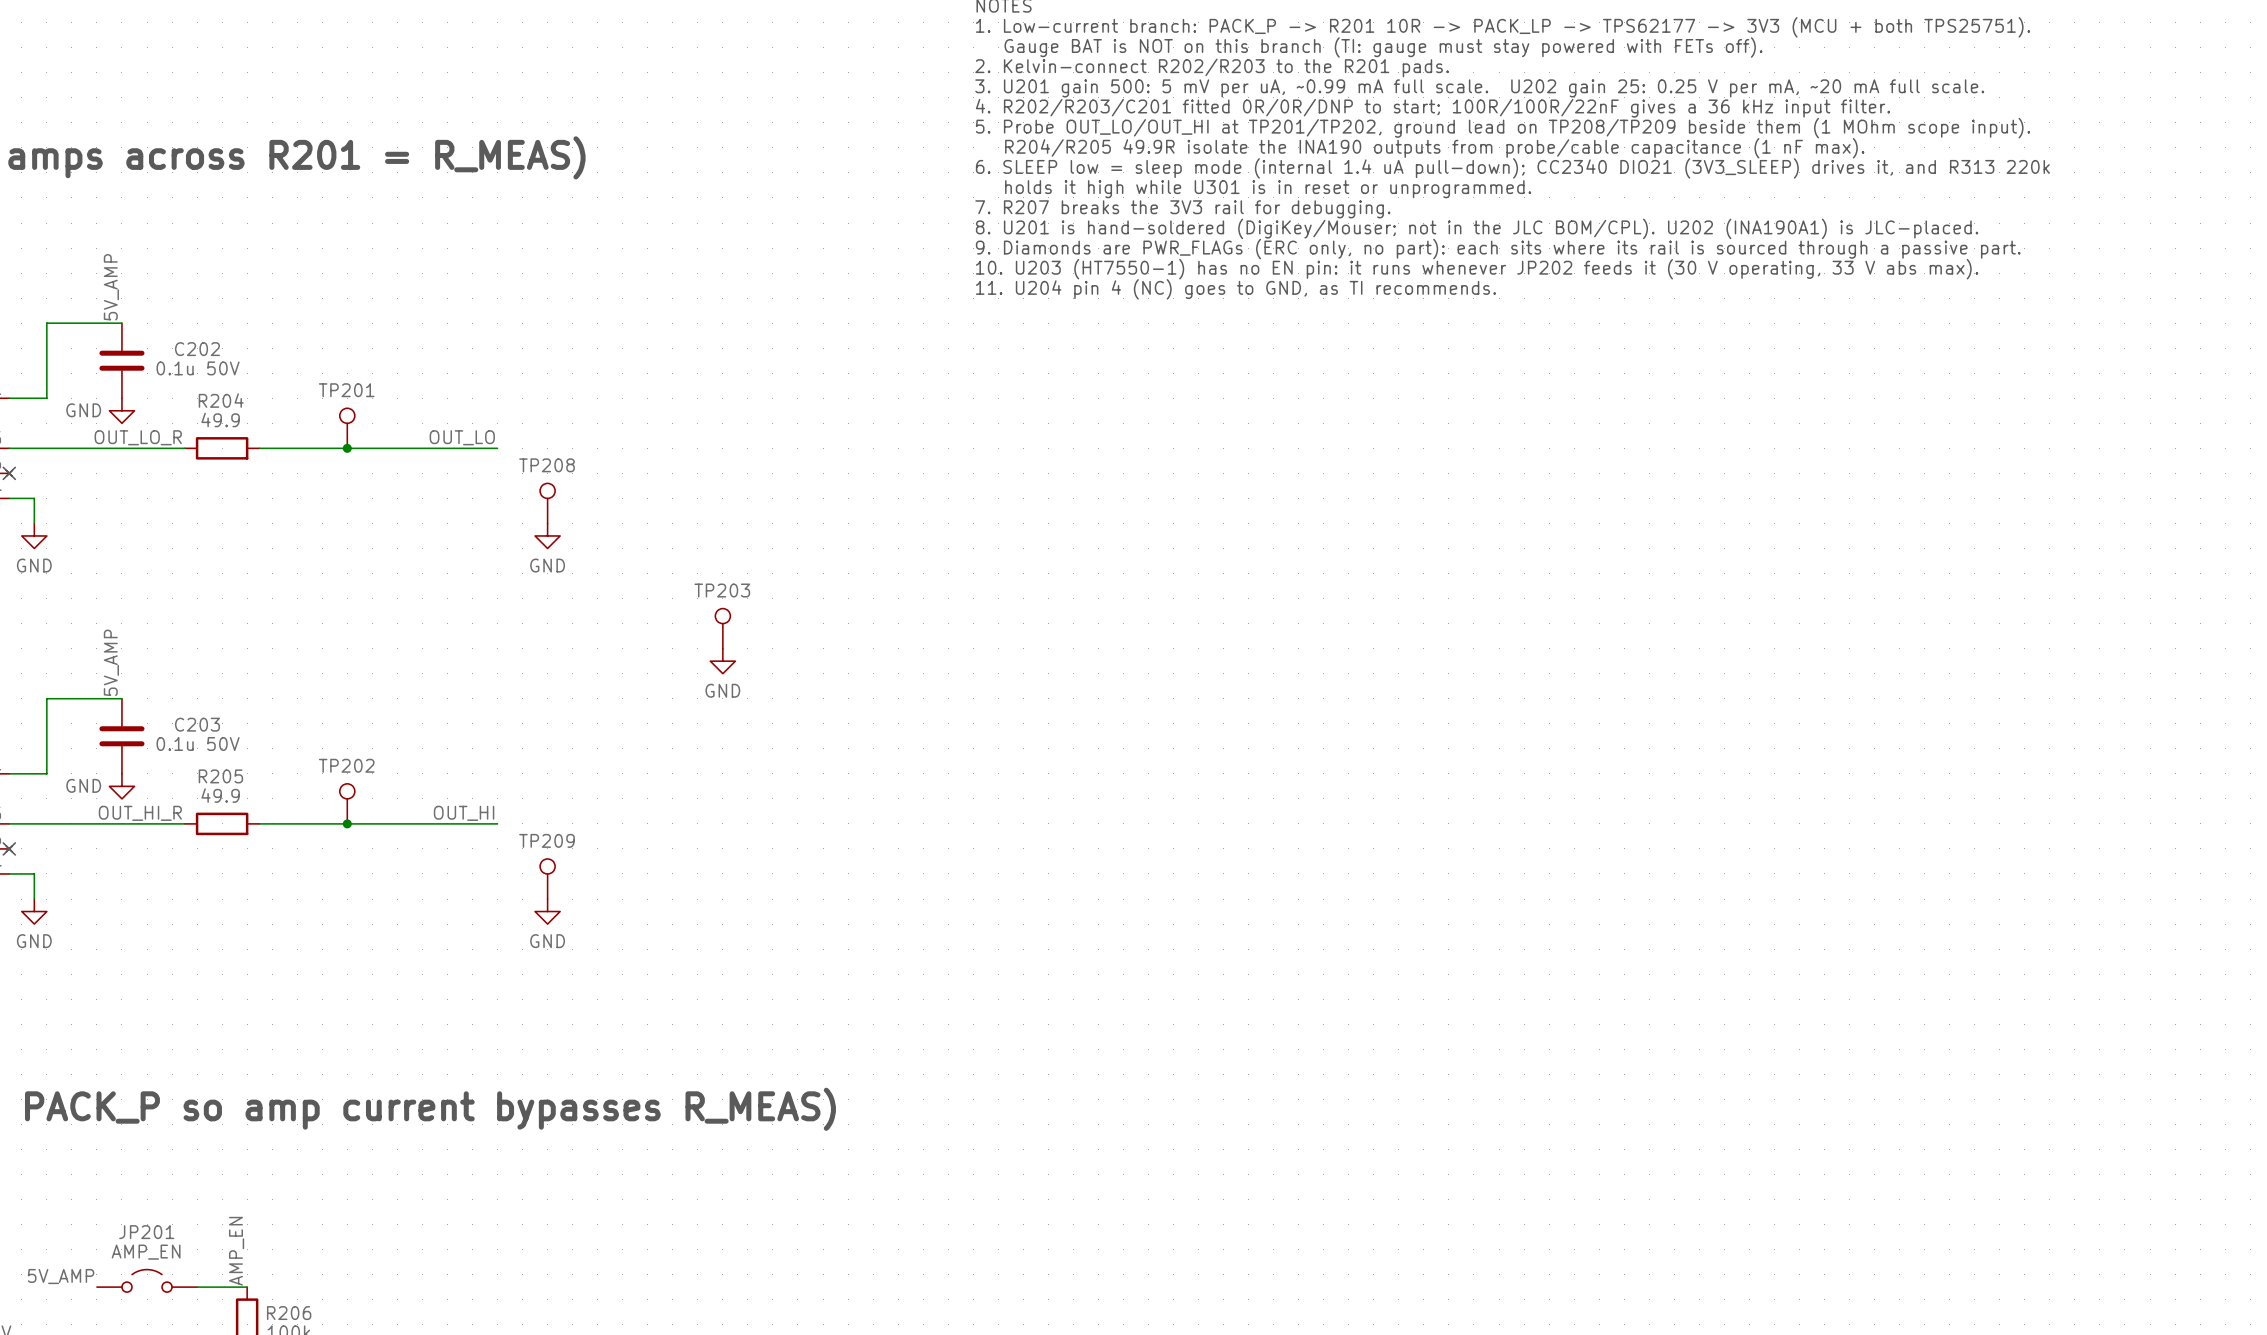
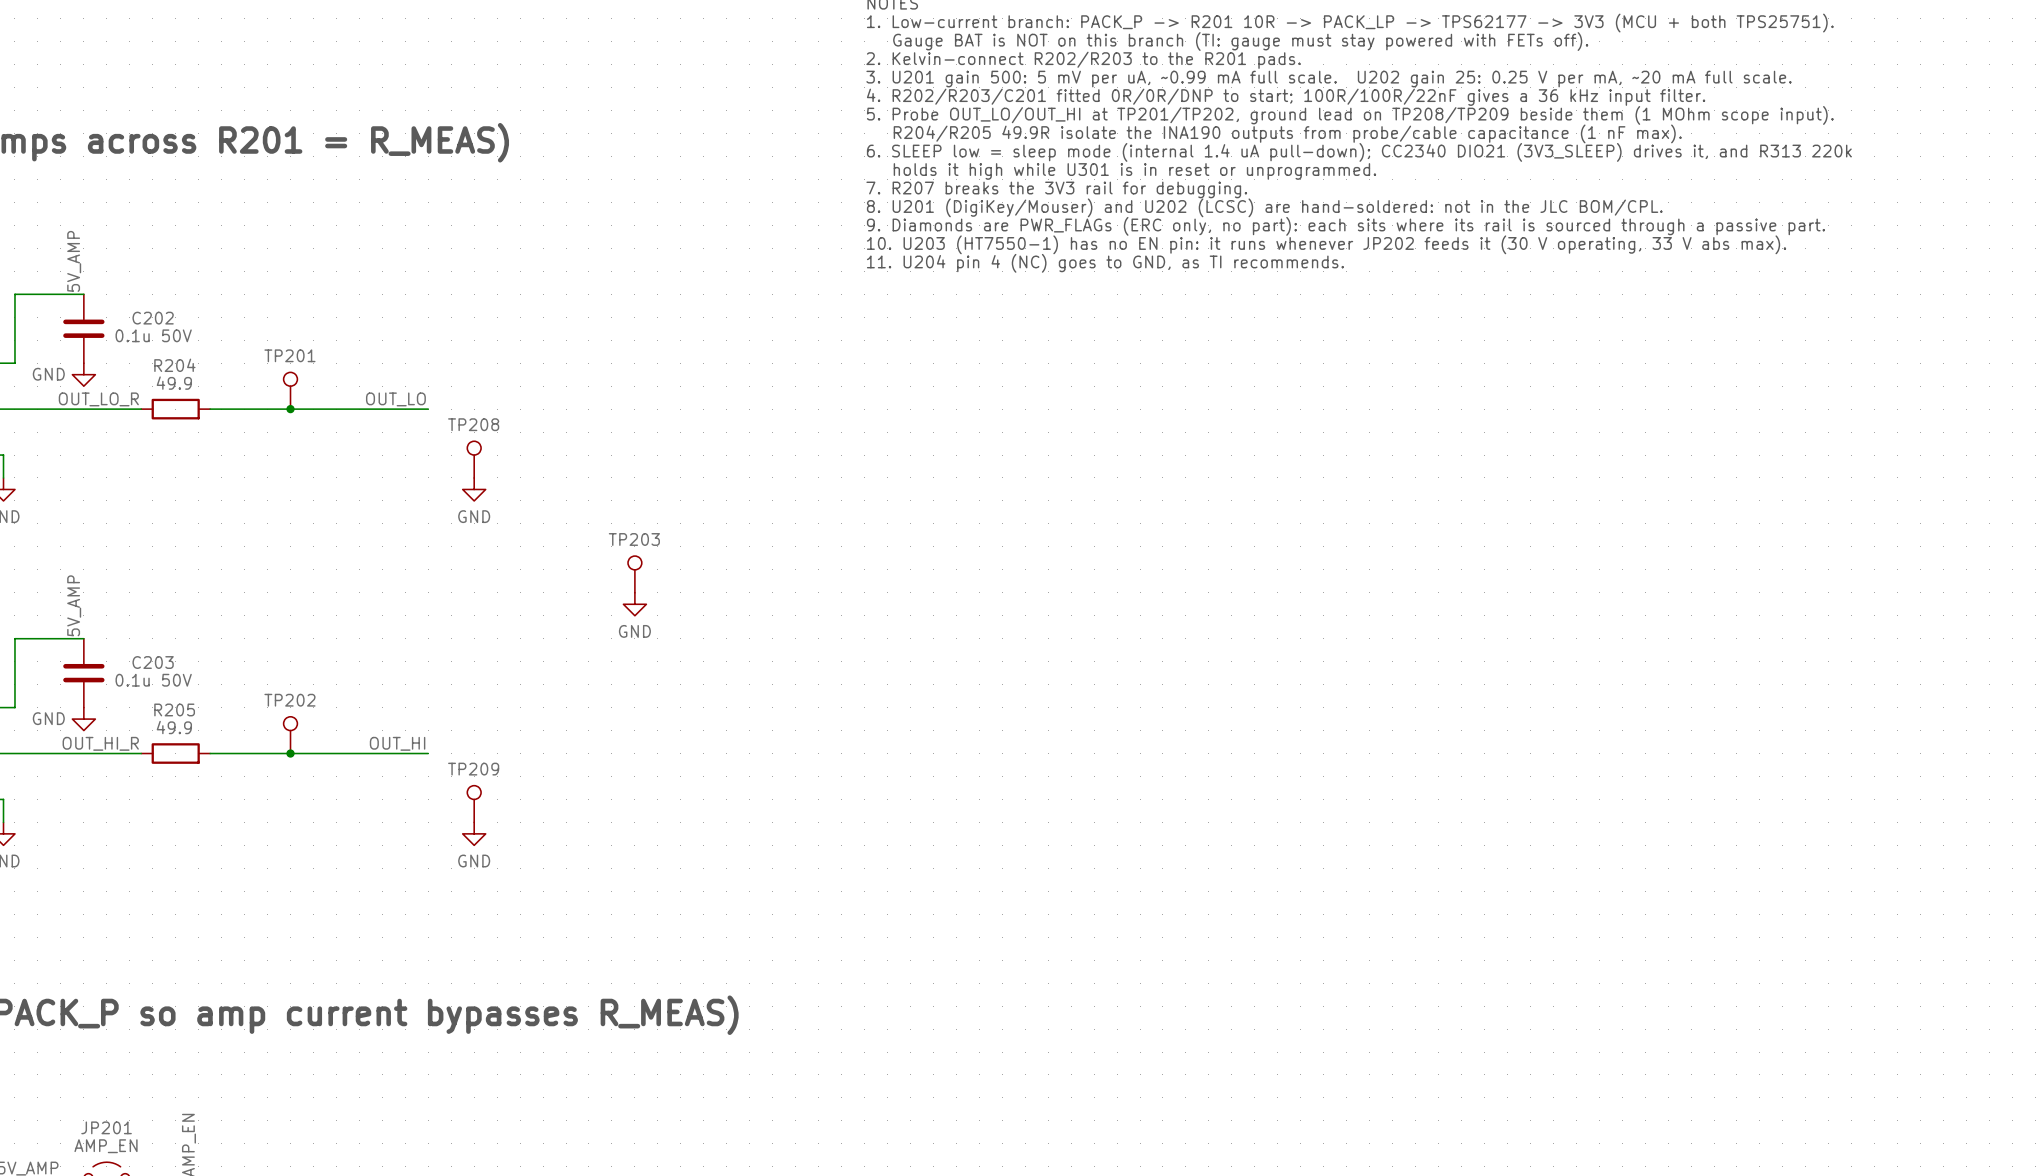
text: 8. U201 is hand-soldered (DigiKey/Mouser; not in the JLC BOM/CPL). U202 (INA190A1) is JLC-placed. (1477, 228) -> 8. U201 (DigiKey/Mouser) and U202 (LCSC) are hand-soldered: not in the JLC BOM/CPL. (1264, 207)

